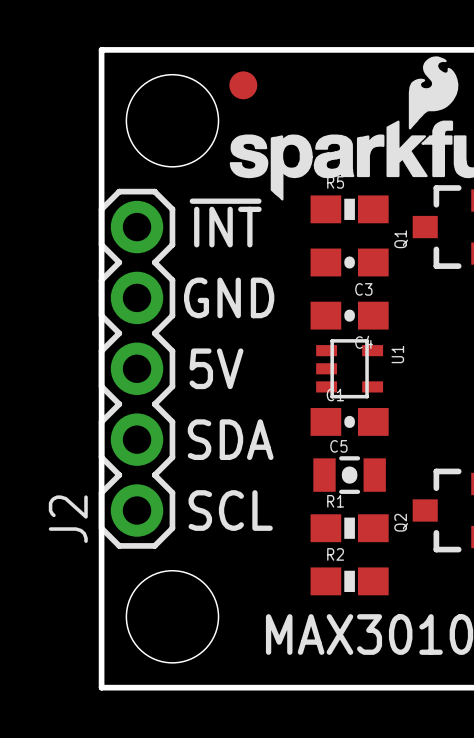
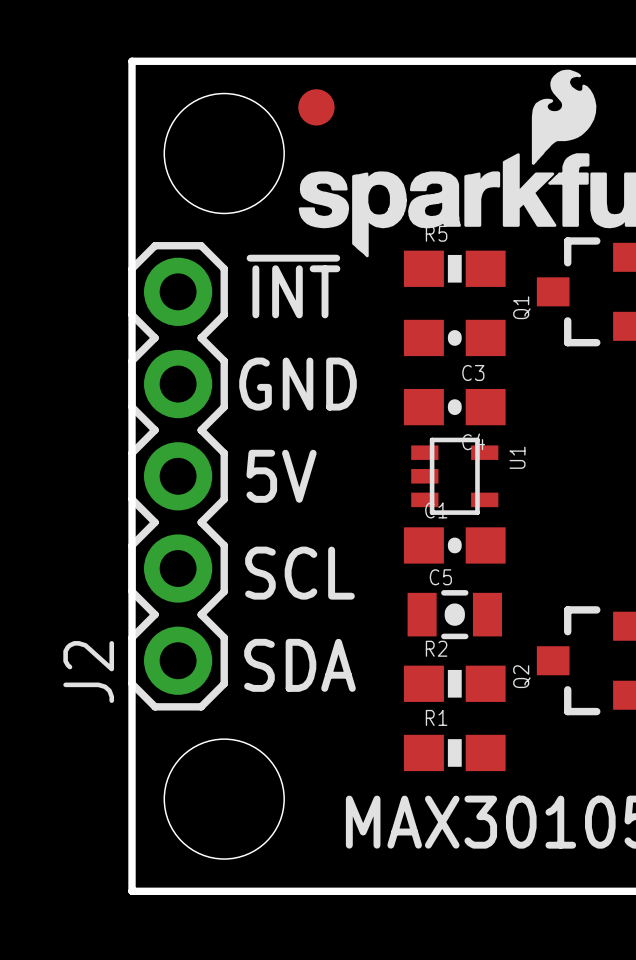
text: SDA (230, 439) -> SCL (299, 573)
R1 name: R1 (335, 501) -> R2 (436, 648)
text: SCL (230, 510) -> SDA (299, 665)
R2 name: R2 (335, 554) -> R1 (436, 717)

